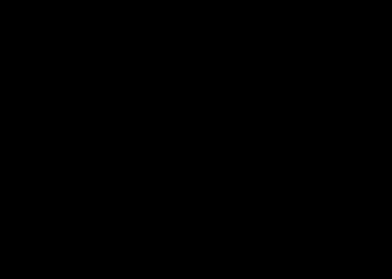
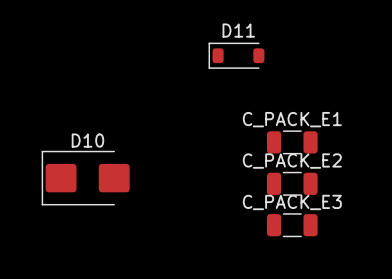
D11: none -> (236, 55)
C_PACK_E1: none -> (292, 142)
D10: none -> (85, 178)
C_PACK_E2: none -> (292, 183)
C_PACK_E3: none -> (292, 225)

